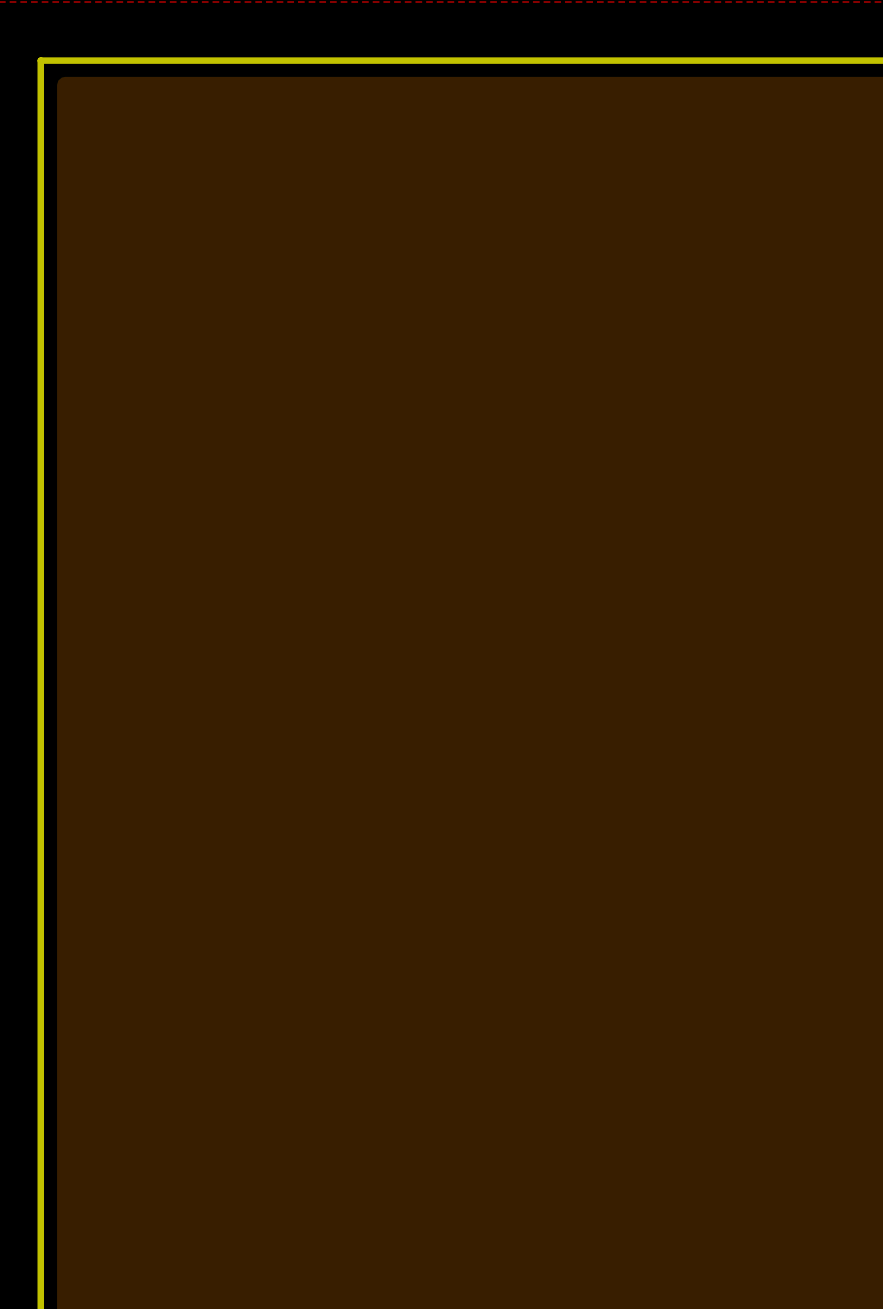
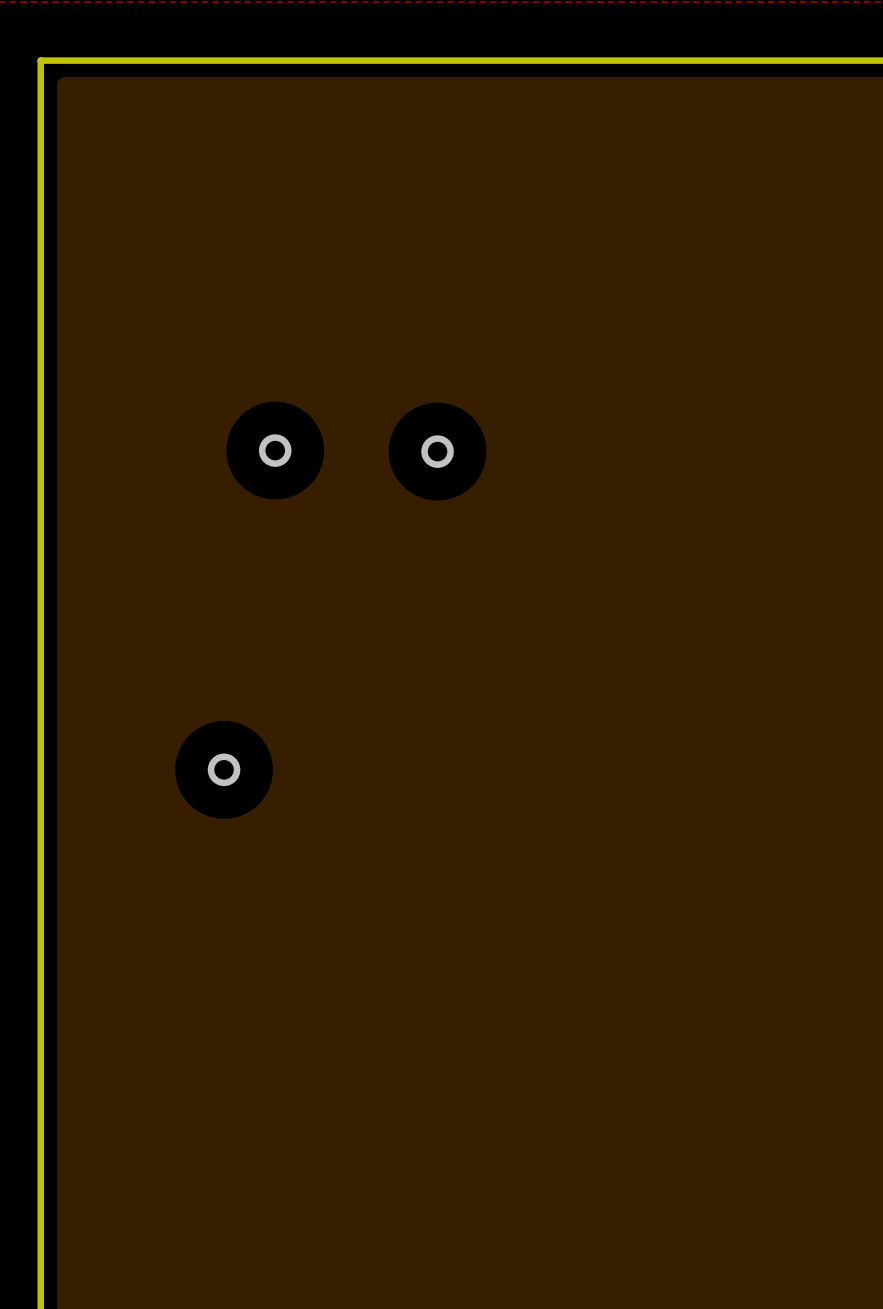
via: none -> (275, 450)
via: none -> (437, 451)
via: none -> (224, 769)

